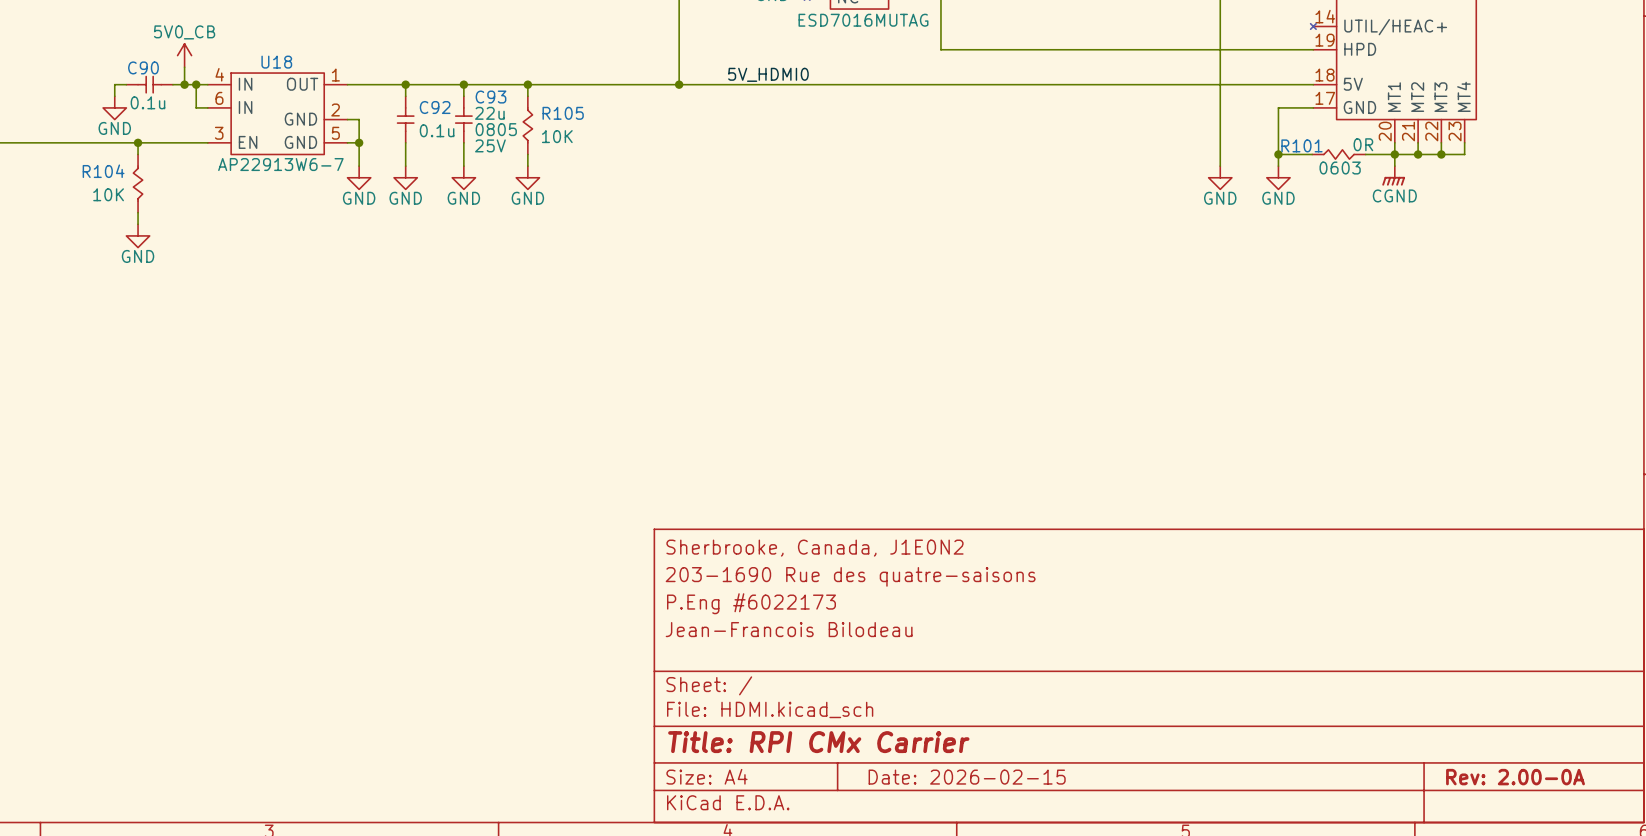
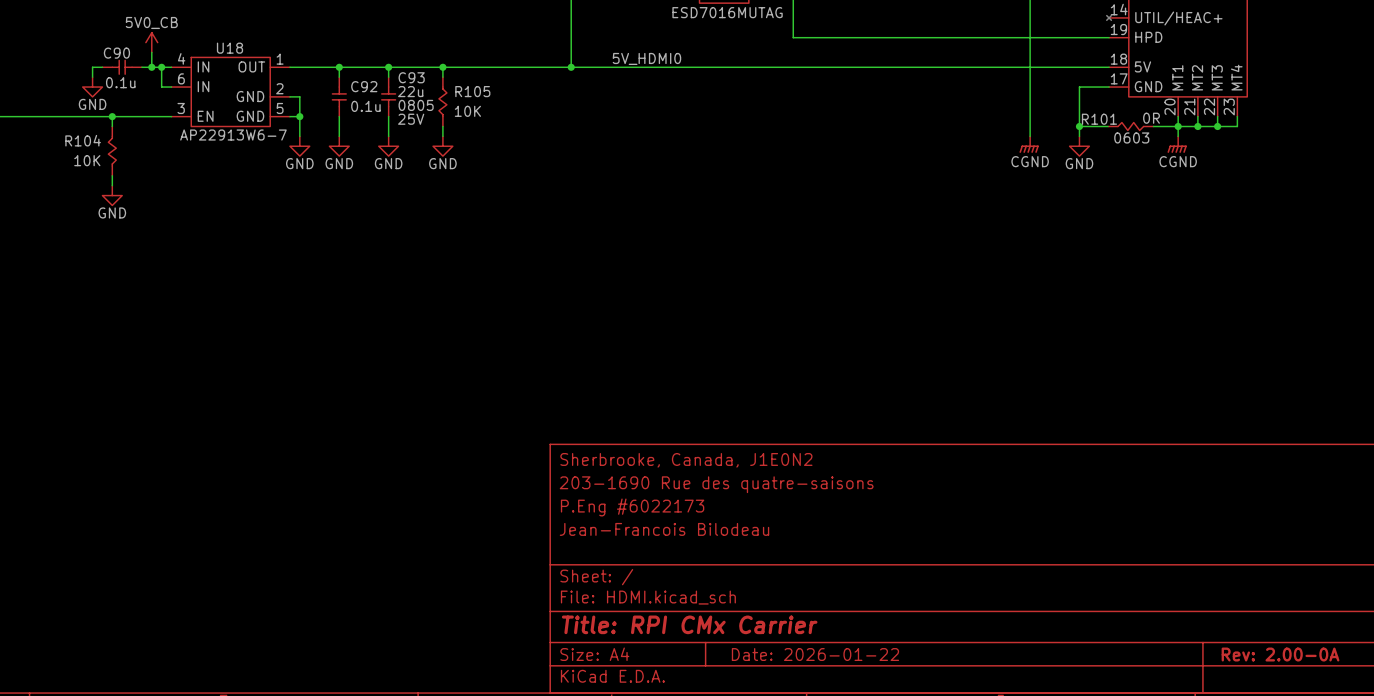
power symbol: GND (1220, 177) -> CGND (1029, 144)
title block: Date: 2026-02-15 (967, 777) -> Date: 2026-01-22 (815, 654)

